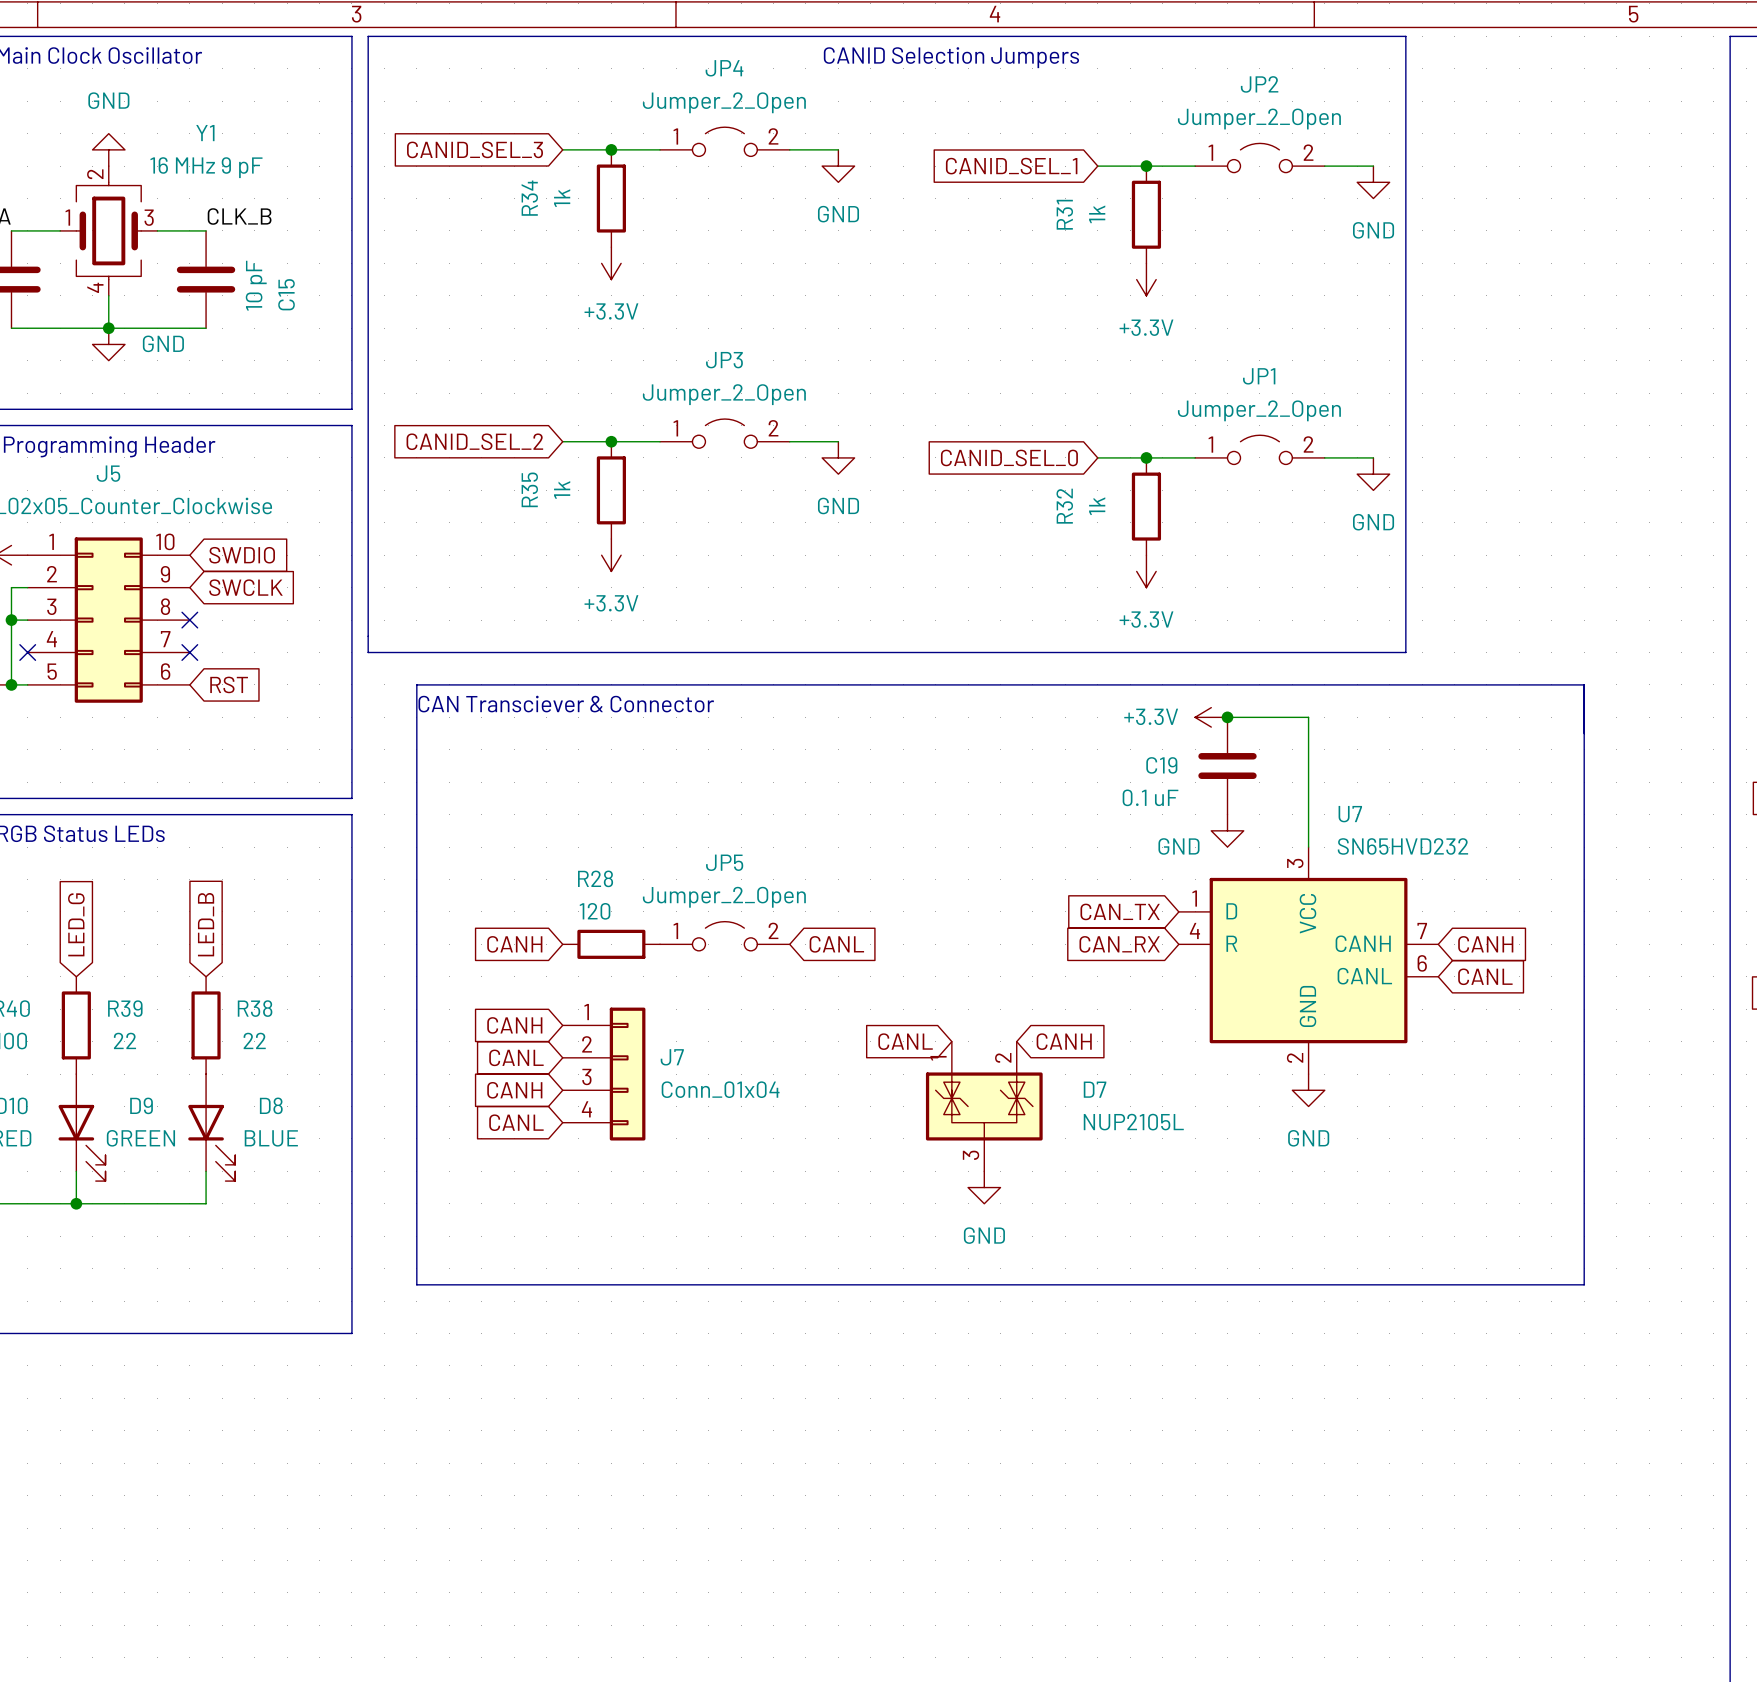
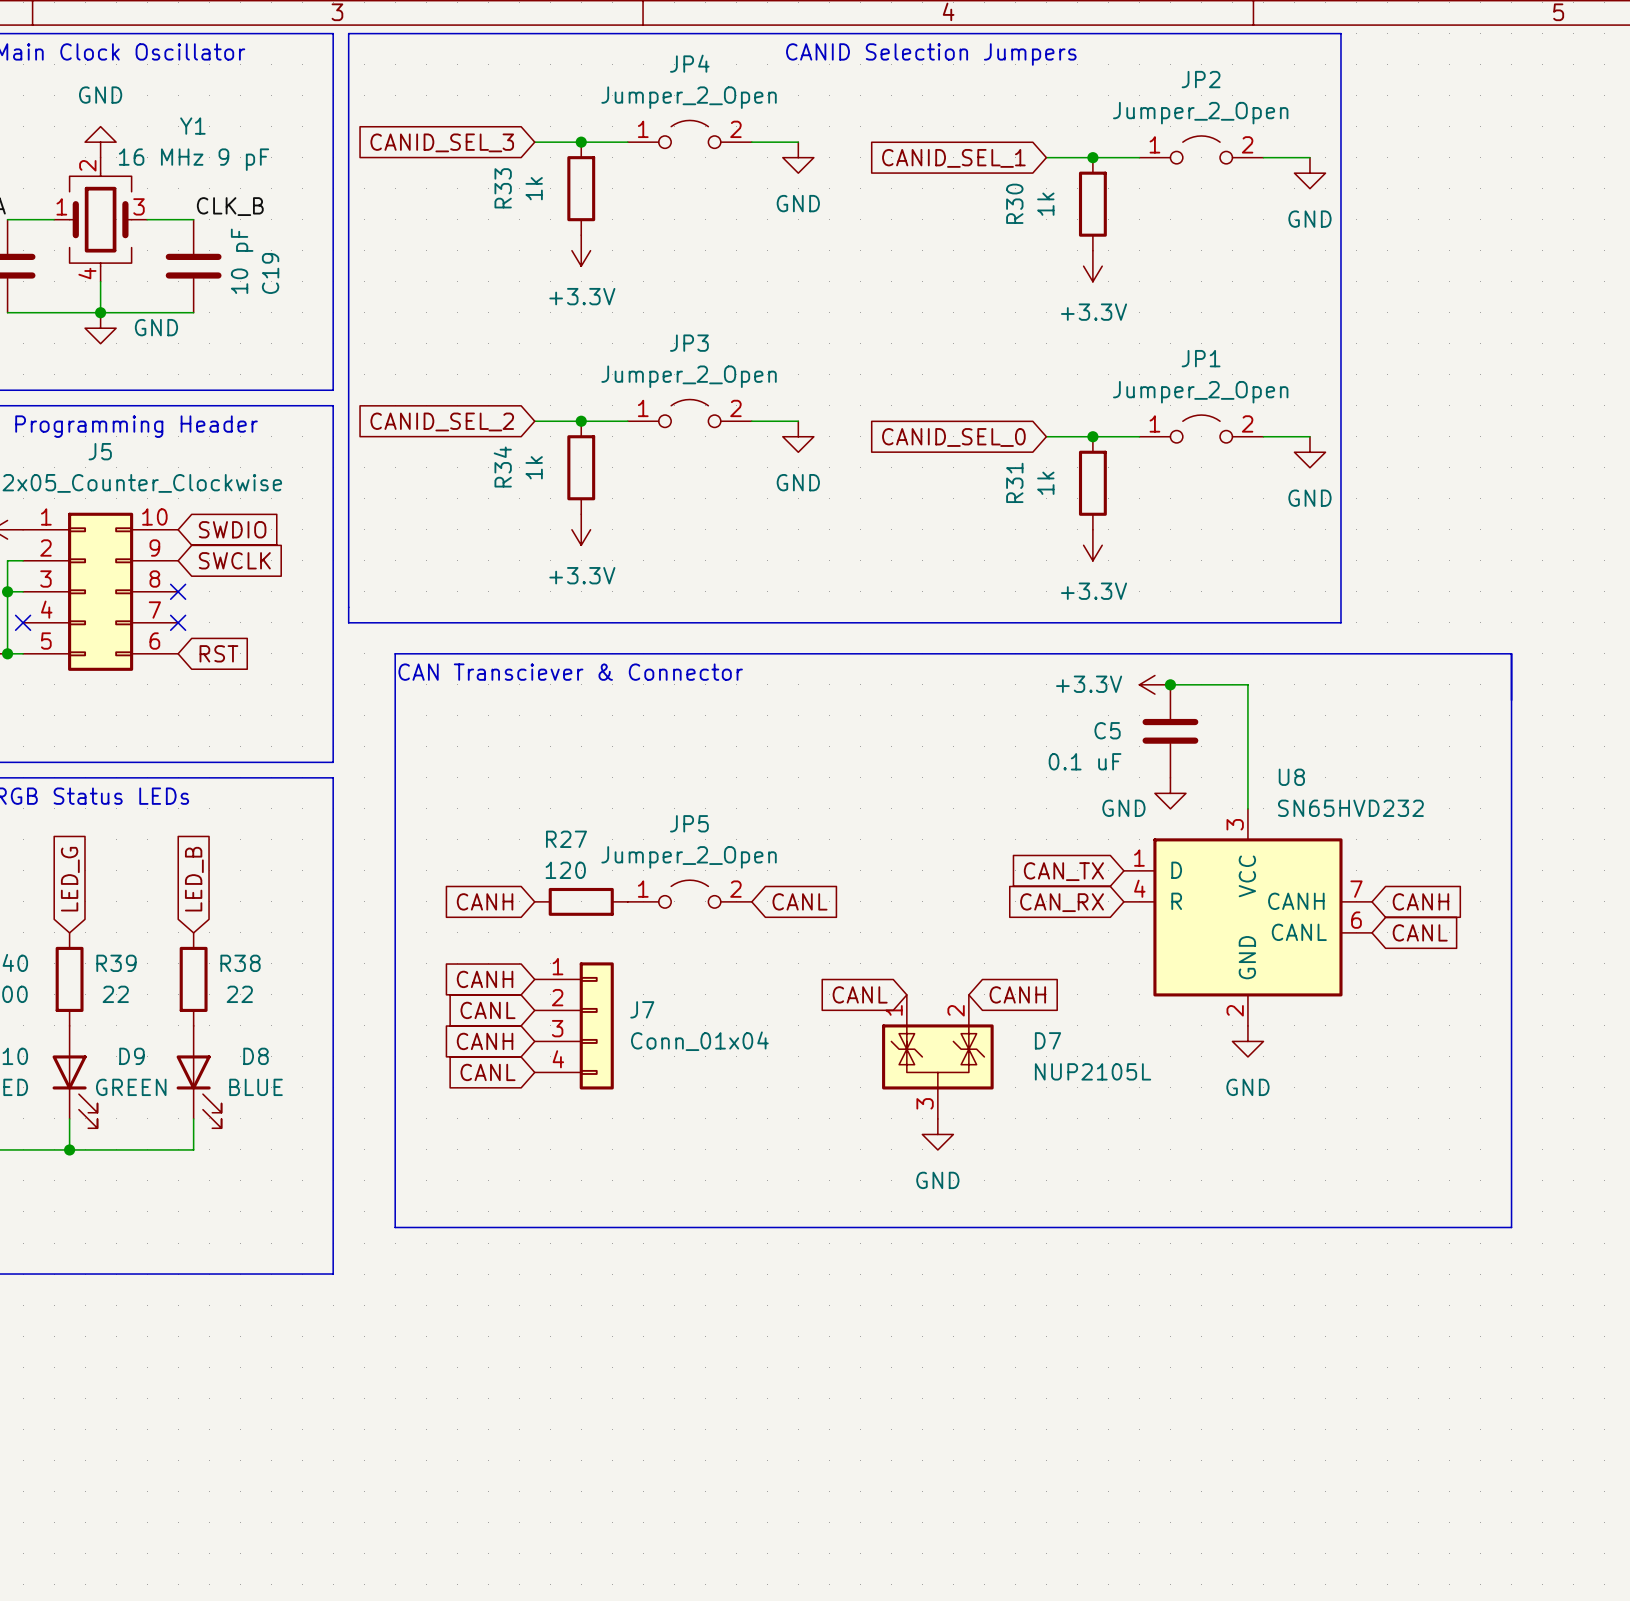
R34 name: R34 (529, 198) -> R33 (503, 188)
R31 name: R31 (1064, 214) -> R30 (1014, 203)
C15 name: C15 (286, 294) -> C19 (270, 273)
R35 name: R35 (529, 489) -> R34 (502, 467)
R32 name: R32 (1064, 506) -> R31 (1014, 482)
C19 name: C19 (1161, 765) -> C5 (1107, 730)
U7 name: U7 (1350, 814) -> U8 (1291, 777)
R28 name: R28 (595, 878) -> R27 (566, 839)

